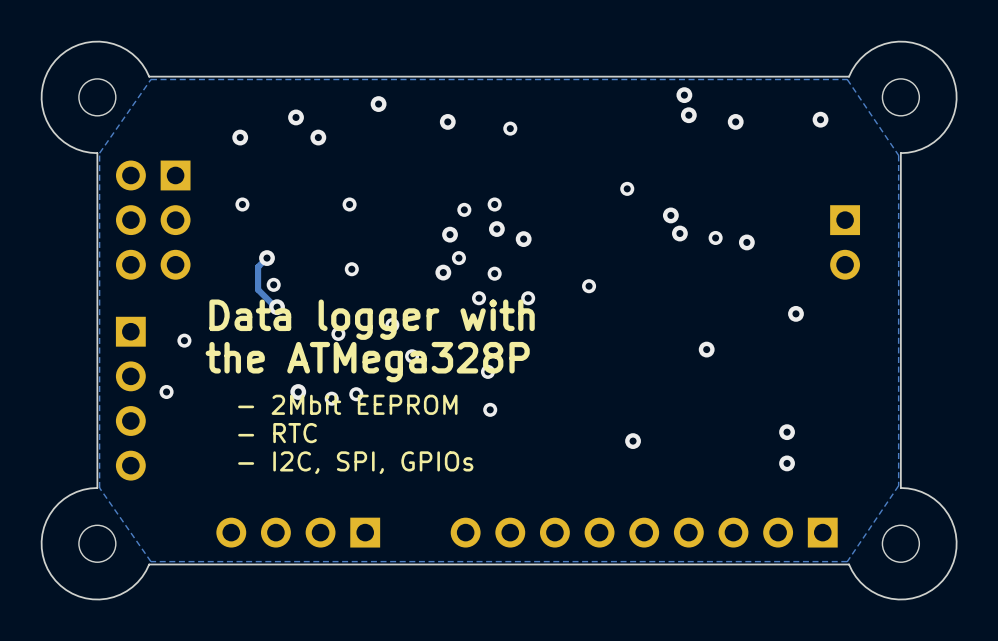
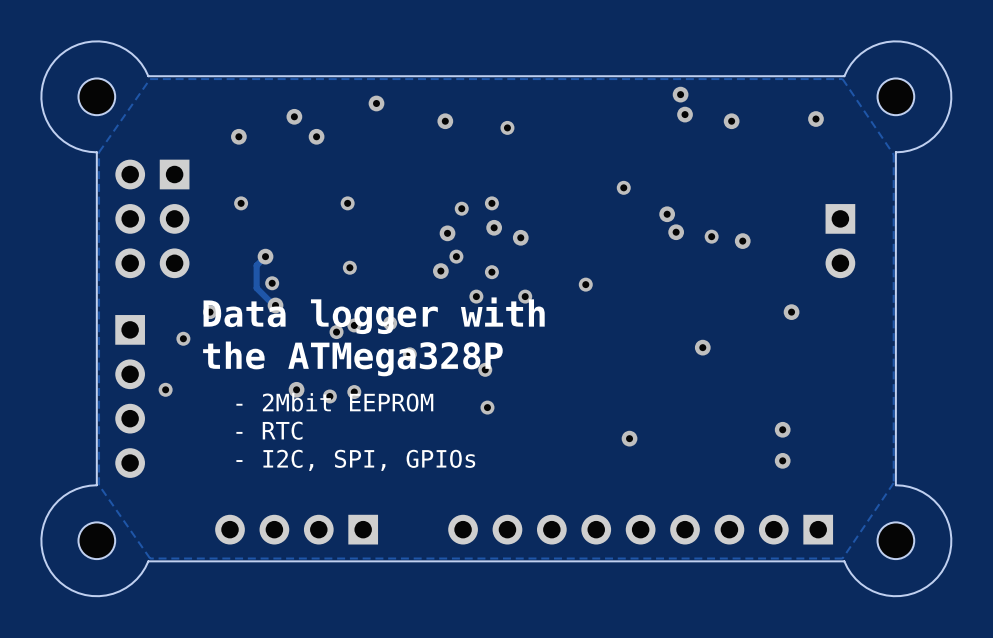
via: none -> (210, 312)
via: none -> (354, 325)

